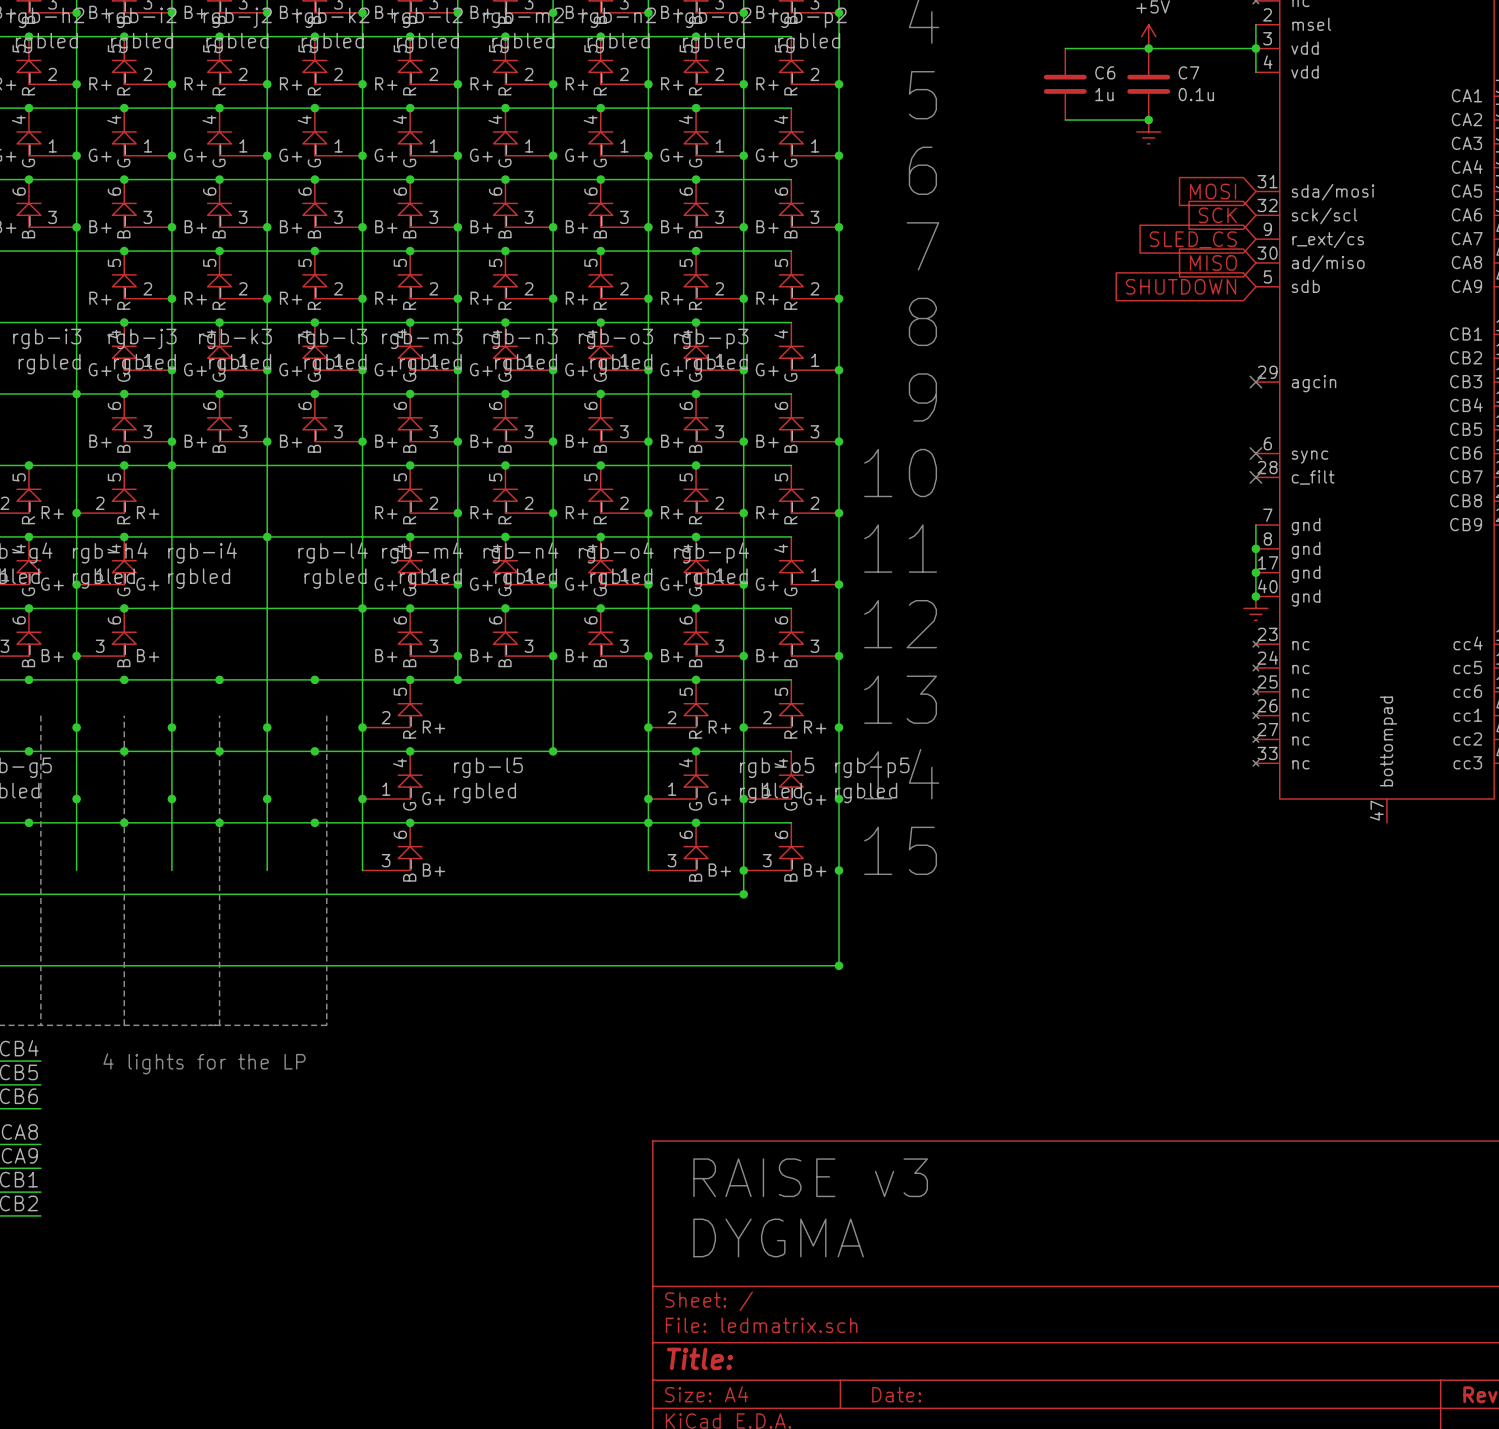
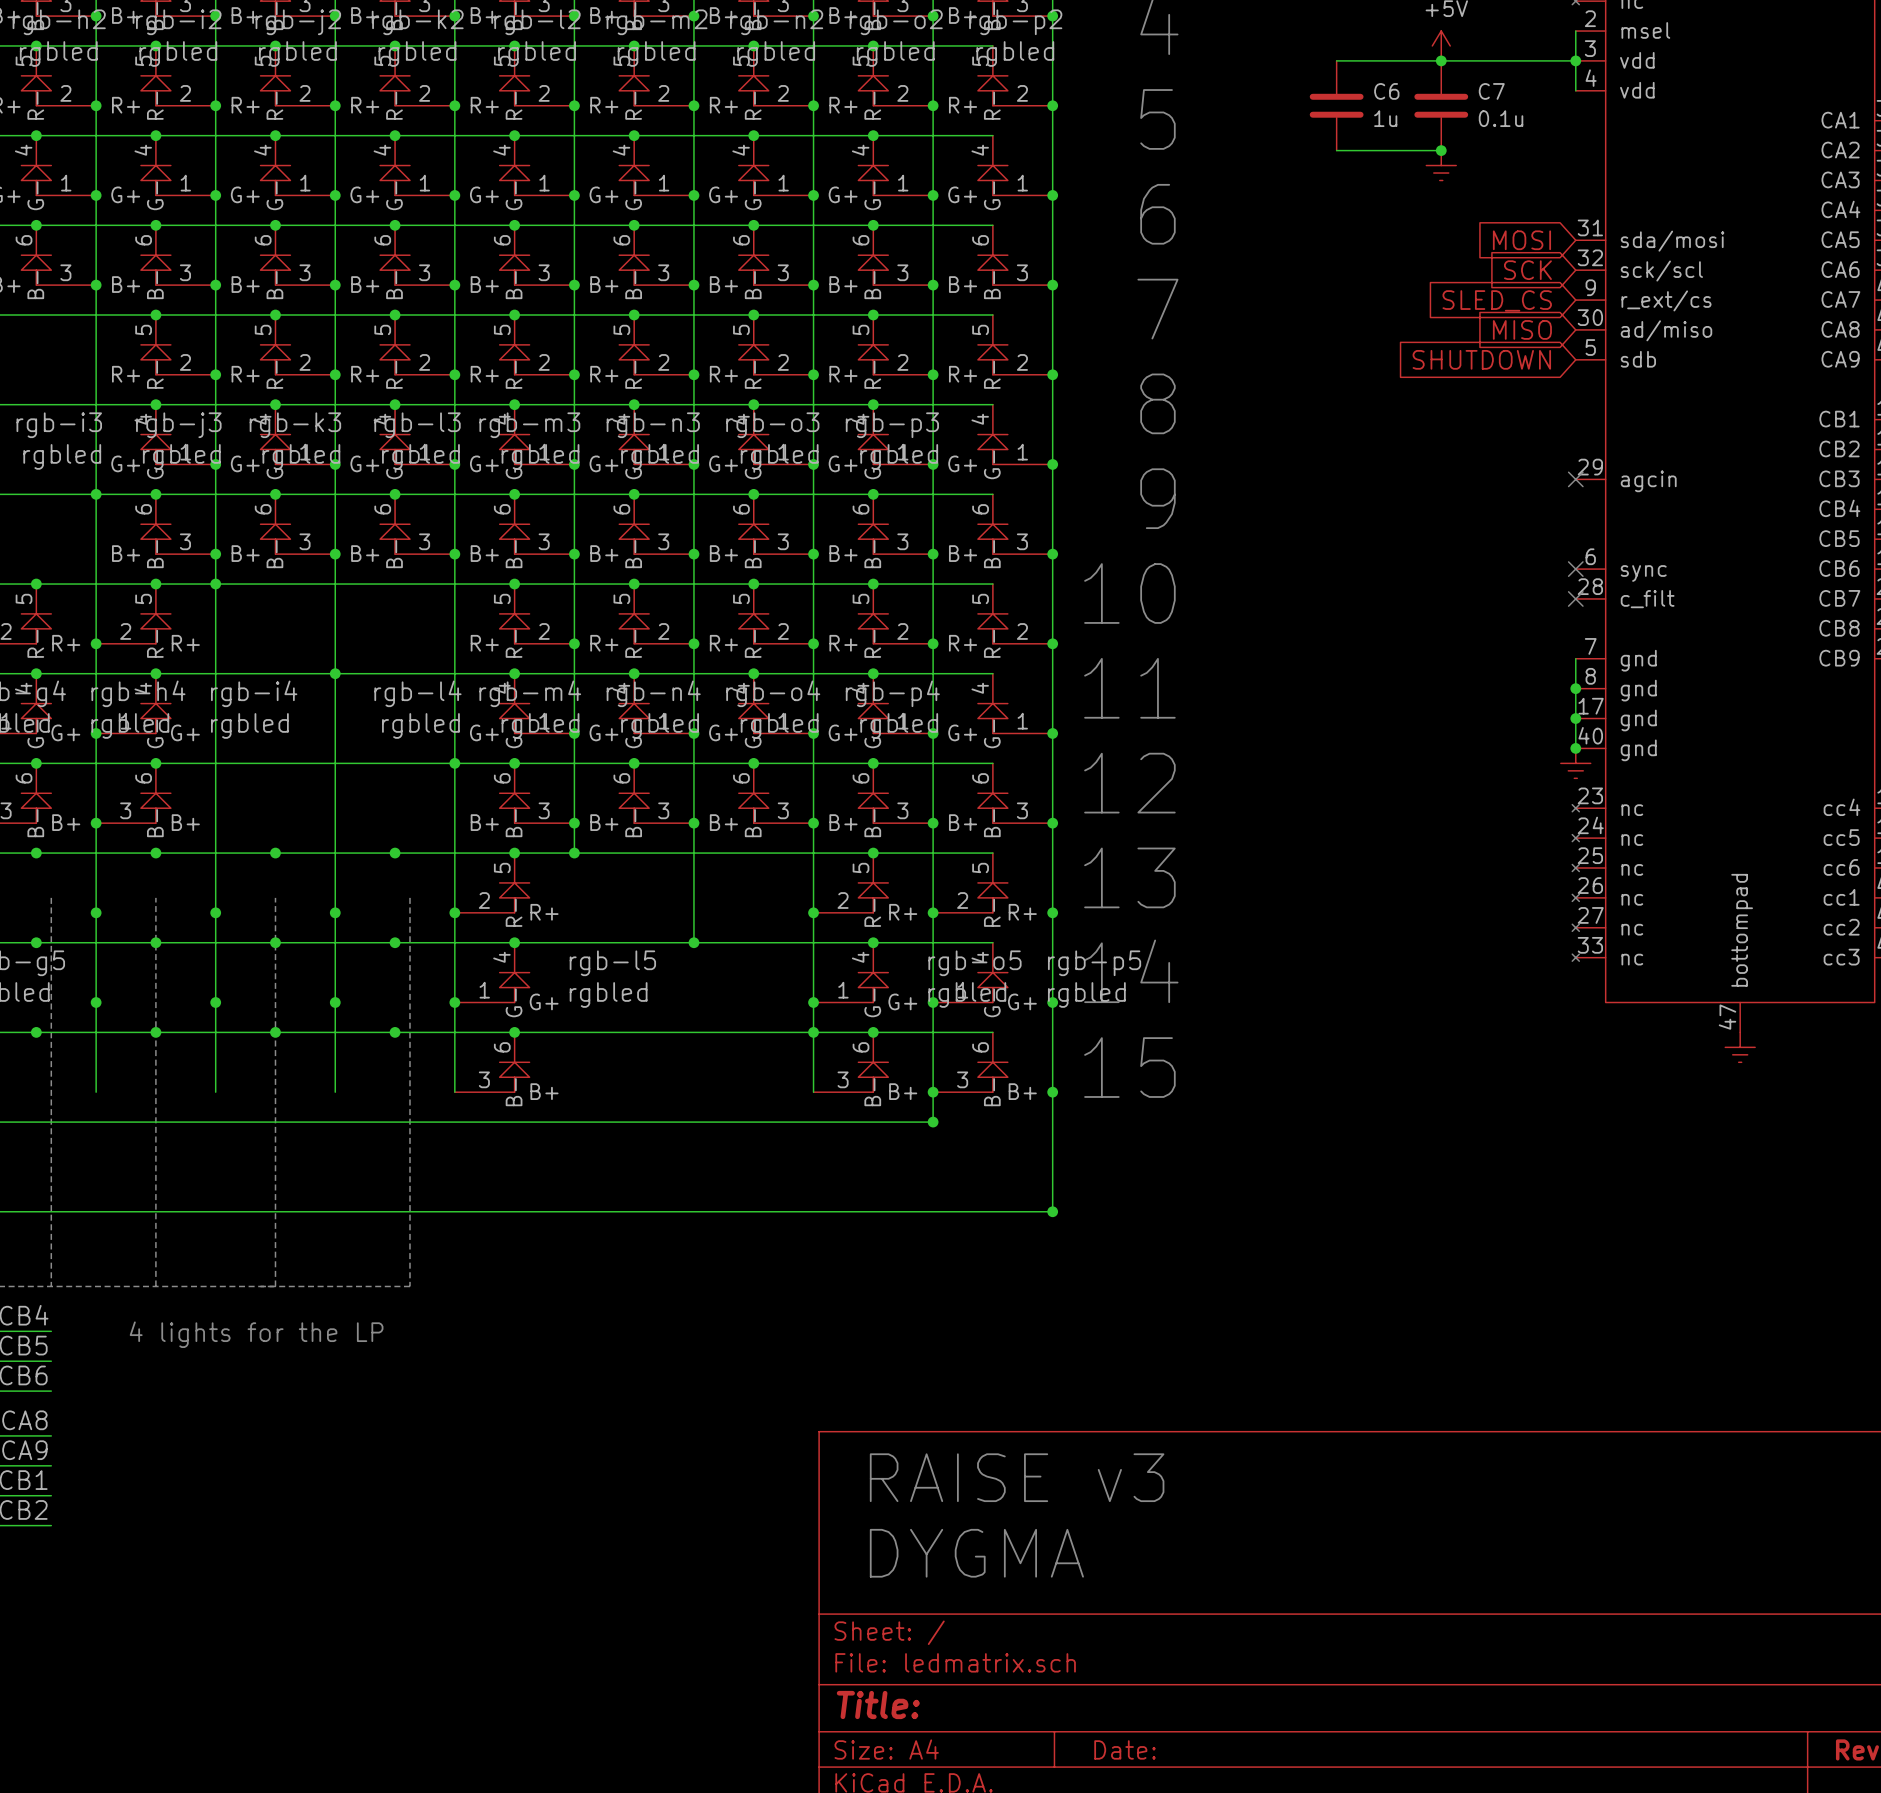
power symbol: none -> (1740, 1047)

